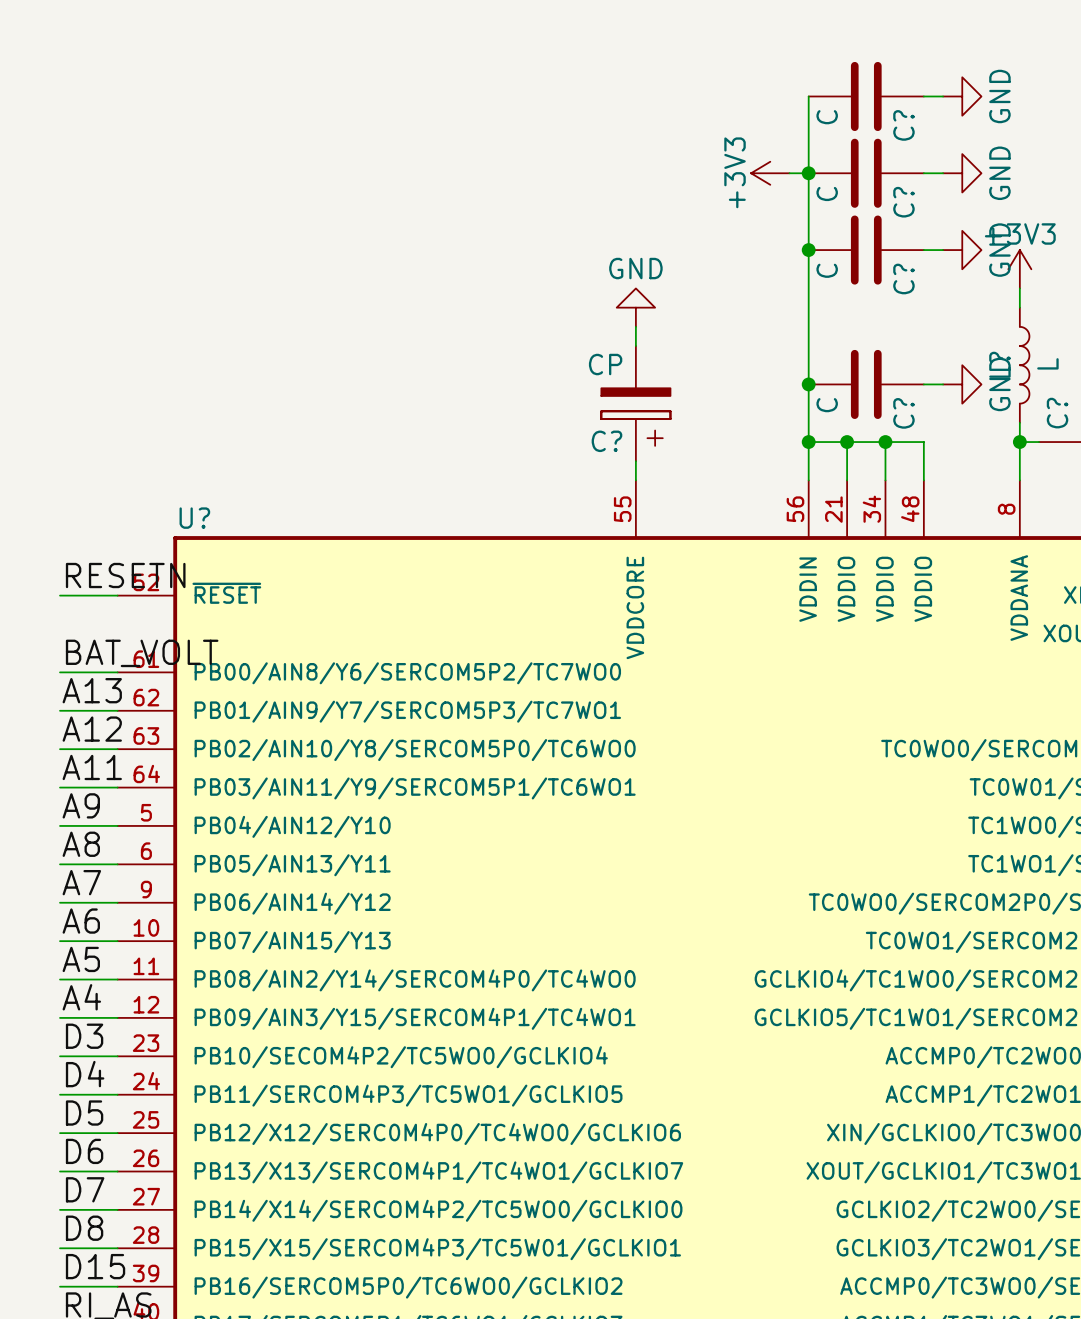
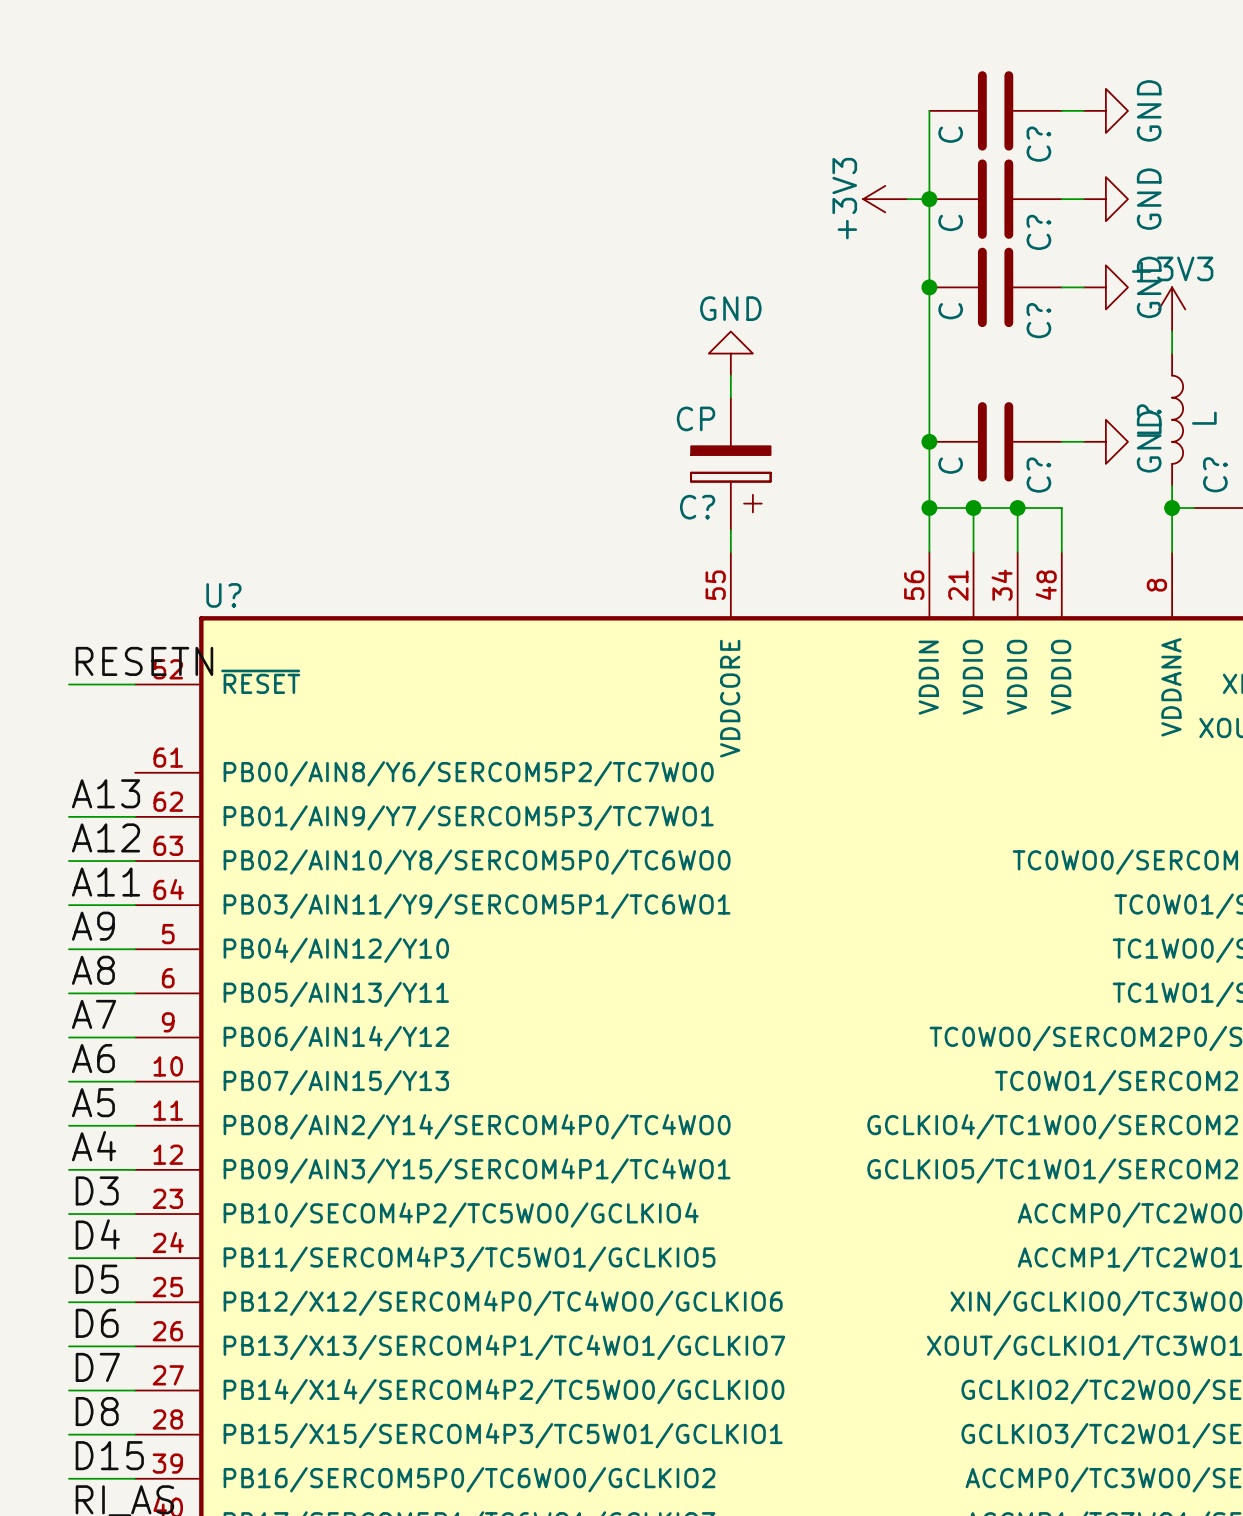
label: BAT_VOLT (142, 653) -> none
wire: (60, 672) (117, 672) -> none

